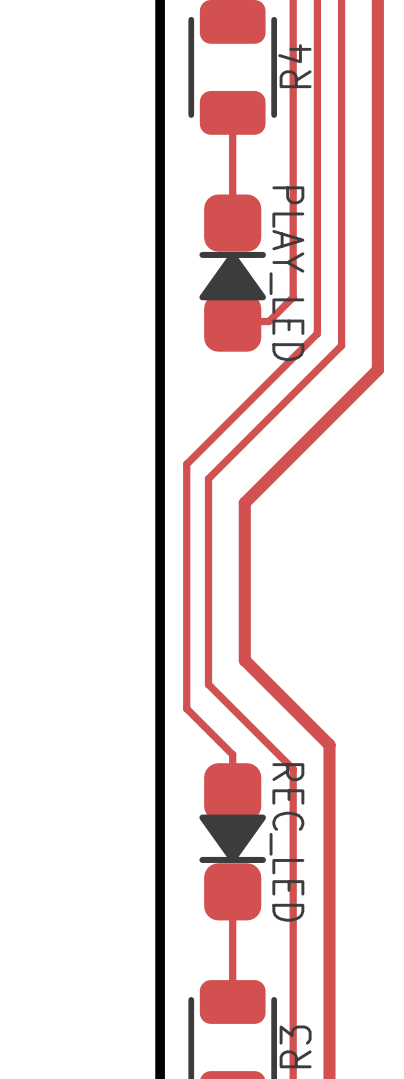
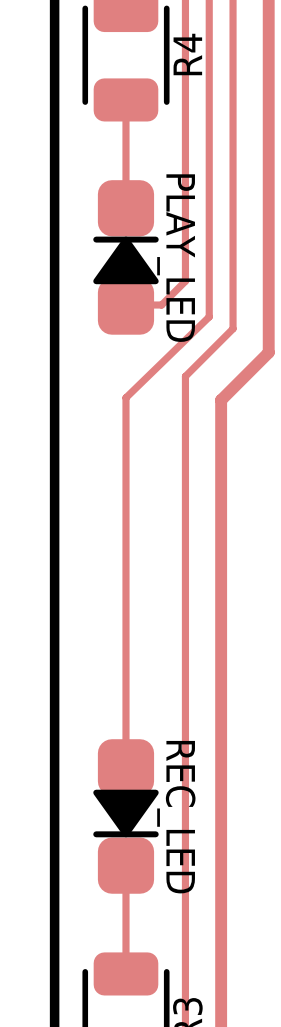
top track: (317, 333) (186, 464) (186, 708) (232, 754) -> (209, 316) (125, 397) (125, 730)
top track: (293, 394) (208, 478) (208, 684) (293, 769) -> (185, 376) (185, 745)
top track: (329, 418) (244, 503) (244, 660) (329, 745) -> (221, 400) (221, 721)

